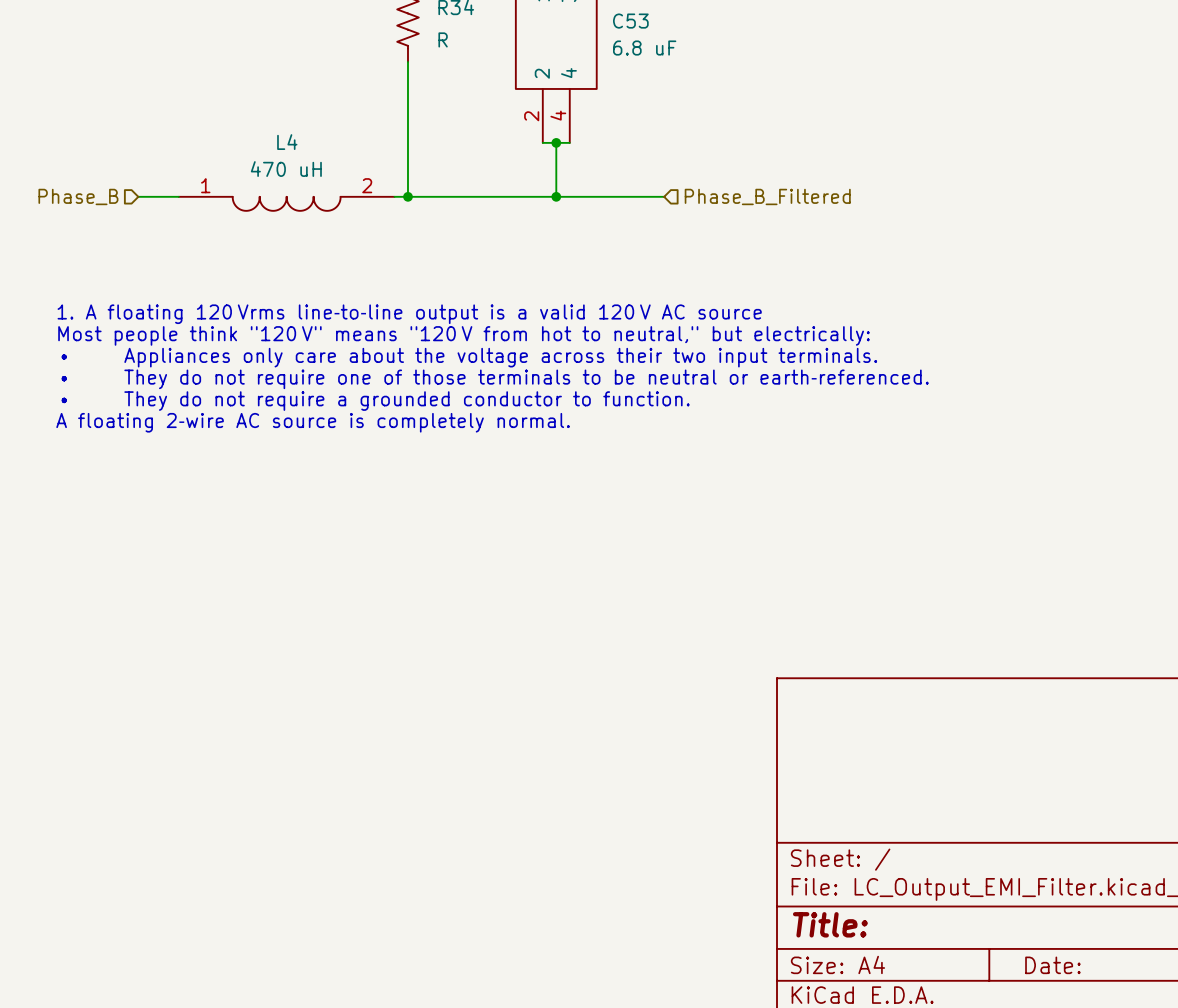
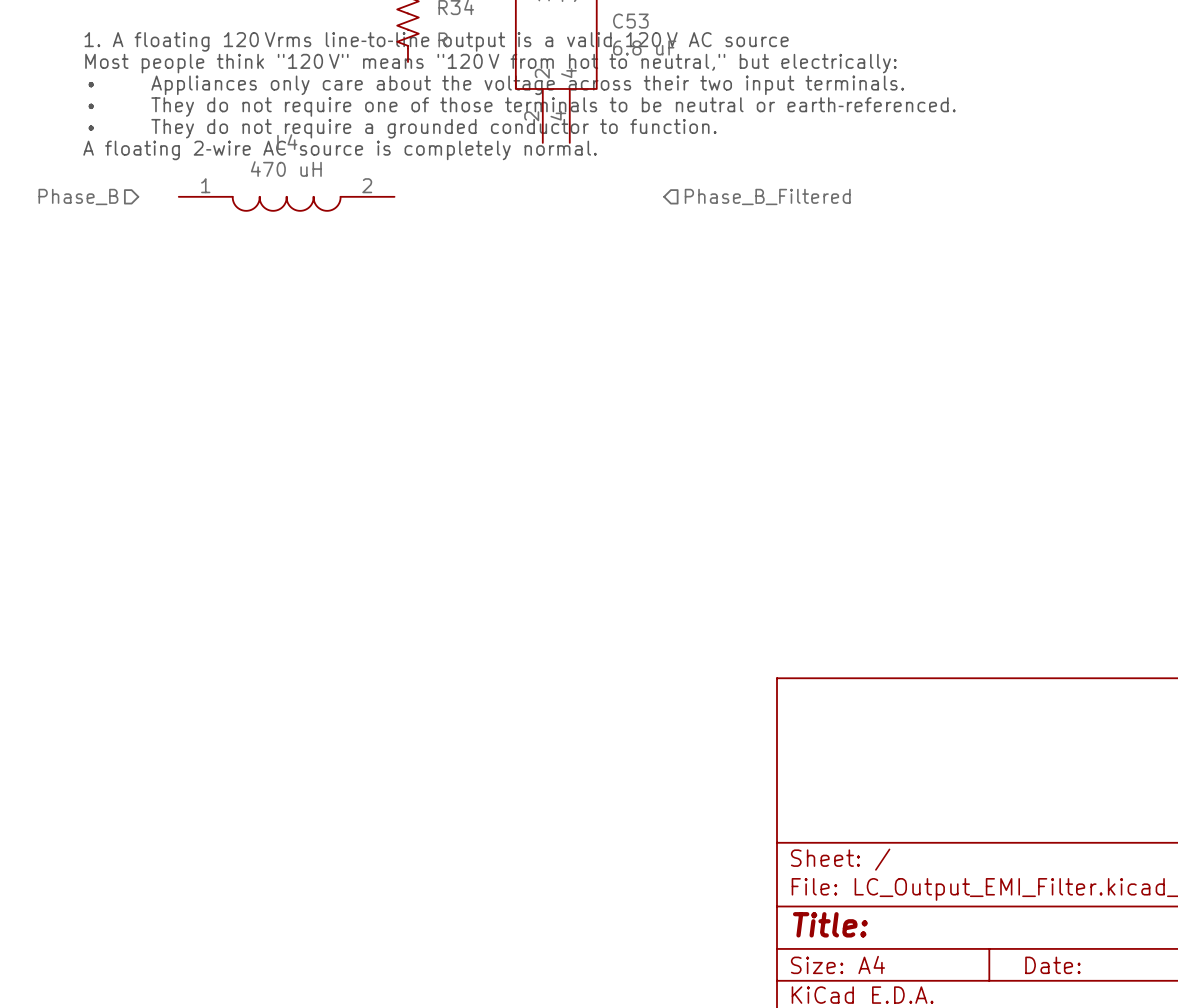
text: none -> 1. A floating 120 Vrms line‑to‑line output is a valid 120 V AC source (436, 41)
wire: (407, 62) (407, 196) -> none
text: none -> Most people think "120 V" means "120 V from hot to neutral," but electrically: (490, 63)
text: none -> • Appliances only care about the voltage across their two input terminals. (496, 85)
text: none -> • They do not require one of those terminals to be neutral or earth‑referenced. (522, 107)
text: none -> • They do not require a grounded conductor to function. (402, 128)
wire: (542, 142) (569, 142) -> none
wire: (556, 142) (556, 196) -> none
junction: (556, 142) -> none
text: none -> A floating 2‑wire AC source is completely normal. (340, 150)
wire: (138, 196) (178, 196) -> none
wire: (394, 196) (664, 196) -> none
junction: (407, 196) -> none
junction: (556, 196) -> none
text: 1. A floating 120 Vrms line‑to‑line output is a valid 120 V AC source (409, 314) -> none
text: Most people think "120 V" means "120 V from hot to neutral," but electrically: (463, 335) -> none
text: • Appliances only care about the voltage across their two input terminals. (469, 357) -> none
text: • They do not require one of those terminals to be neutral or earth‑referenced. (495, 379) -> none
text: • They do not require a grounded conductor to function. (375, 401) -> none
text: A floating 2‑wire AC source is completely normal. (313, 422) -> none

